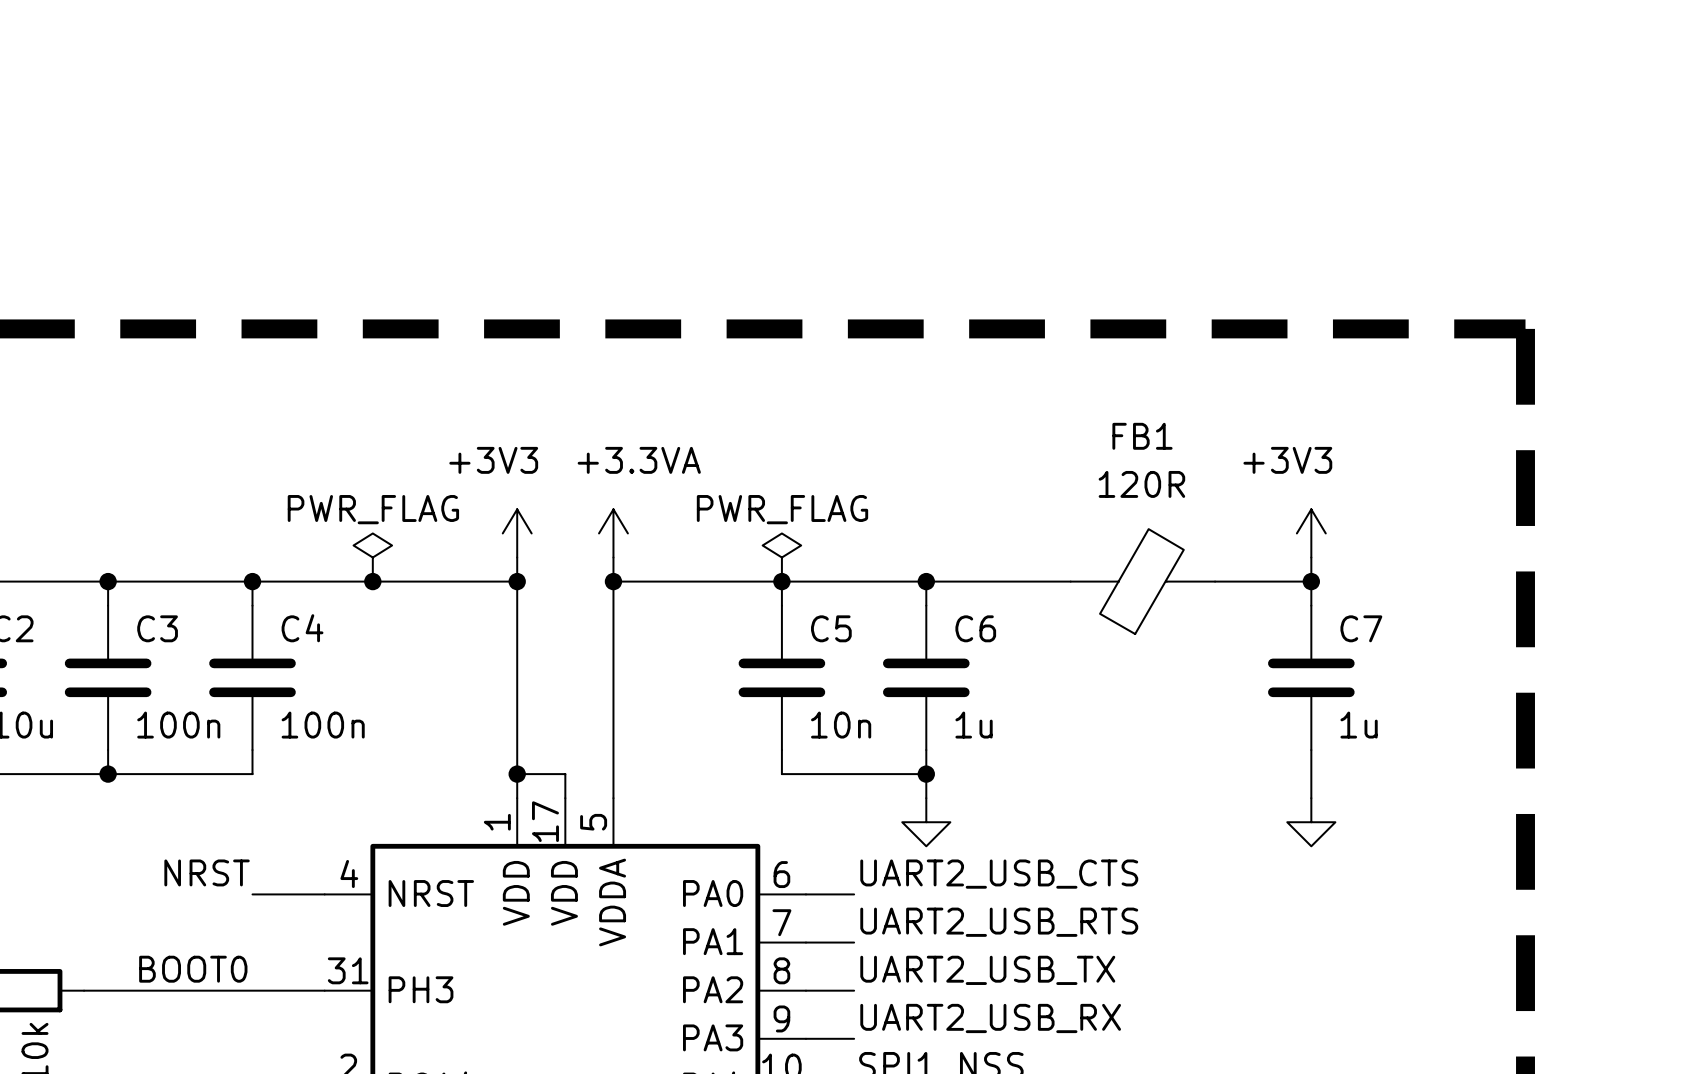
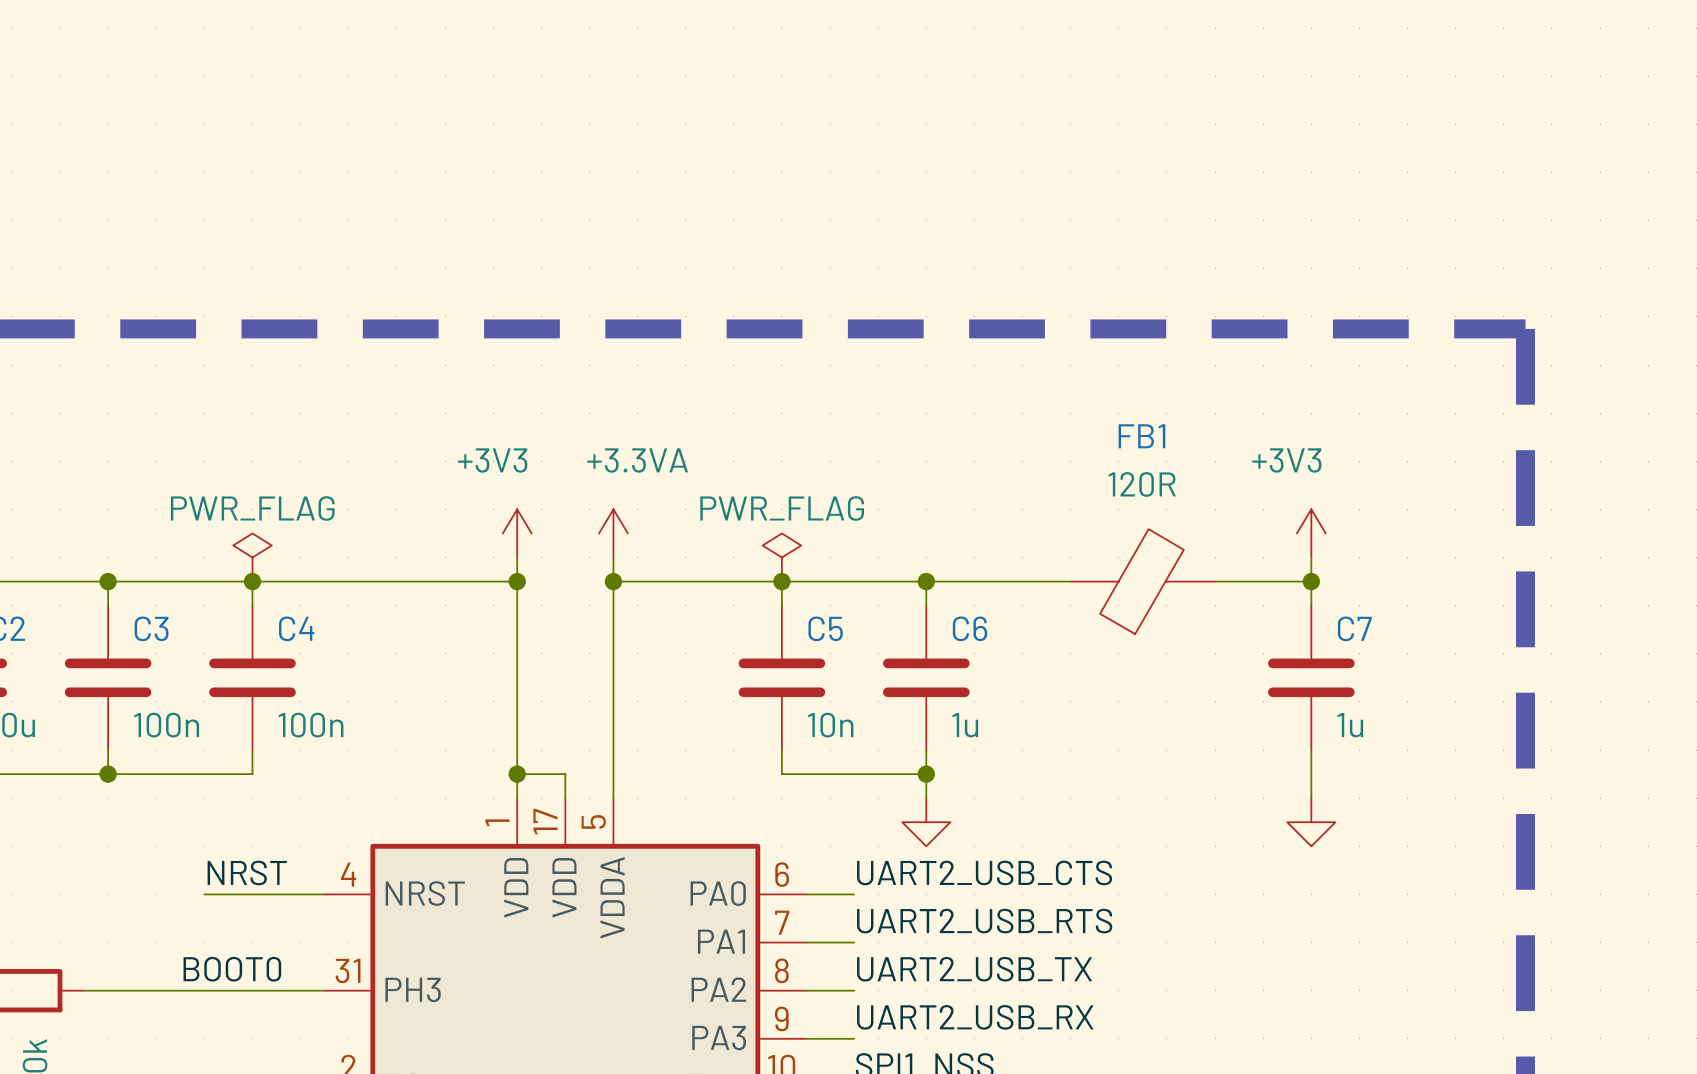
power symbol position: PWR_FLAG (372, 557) -> PWR_FLAG (252, 557)
junction: (372, 581) -> none
label position: NRST (207, 872) -> NRST (247, 872)
wire: none -> (204, 894) (252, 894)
label position: BOOT0 (193, 969) -> BOOT0 (232, 969)

